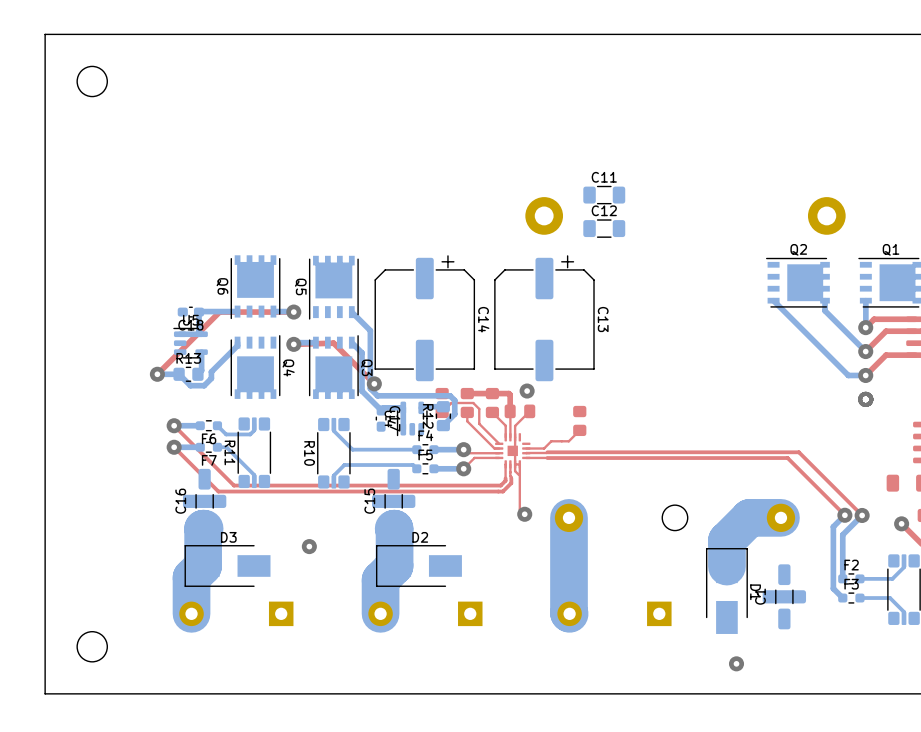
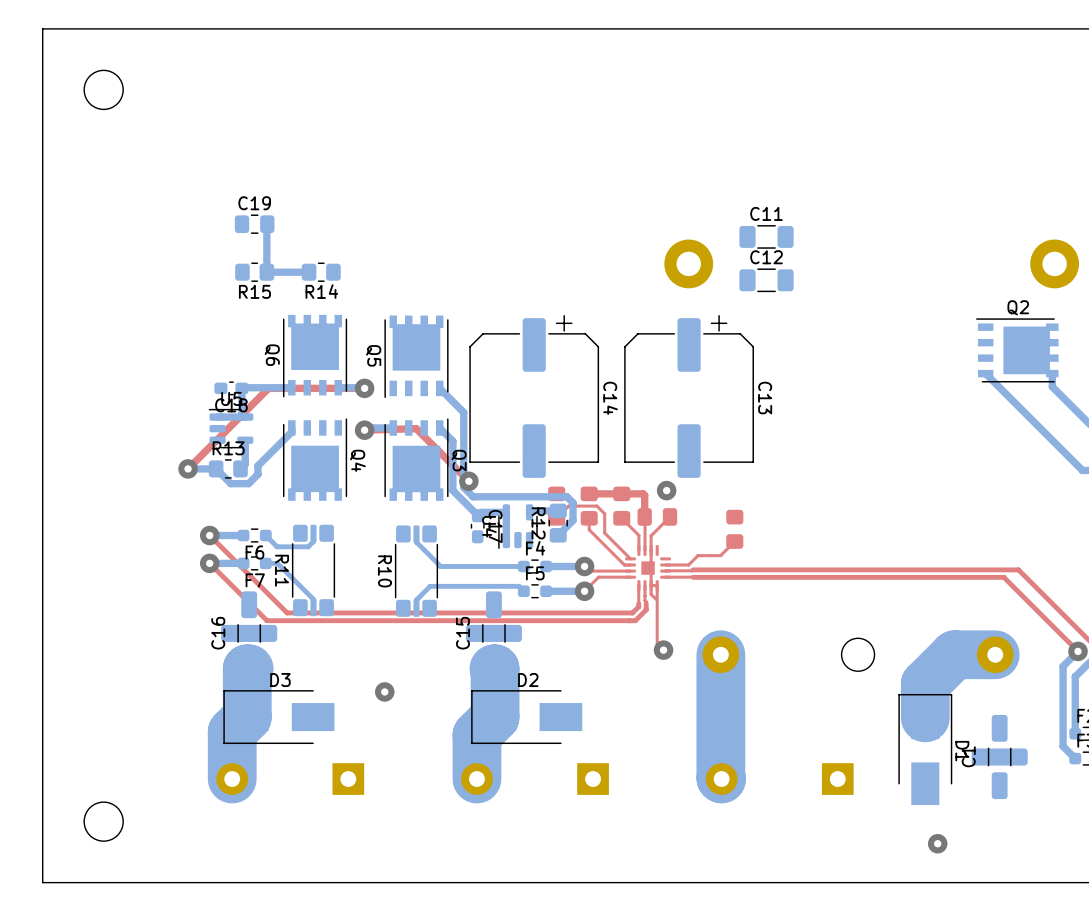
C19: none -> (254, 224)
bottom track: none -> (267, 224) (266, 272) (309, 272)
R15: none -> (254, 272)
R14: none -> (321, 272)

